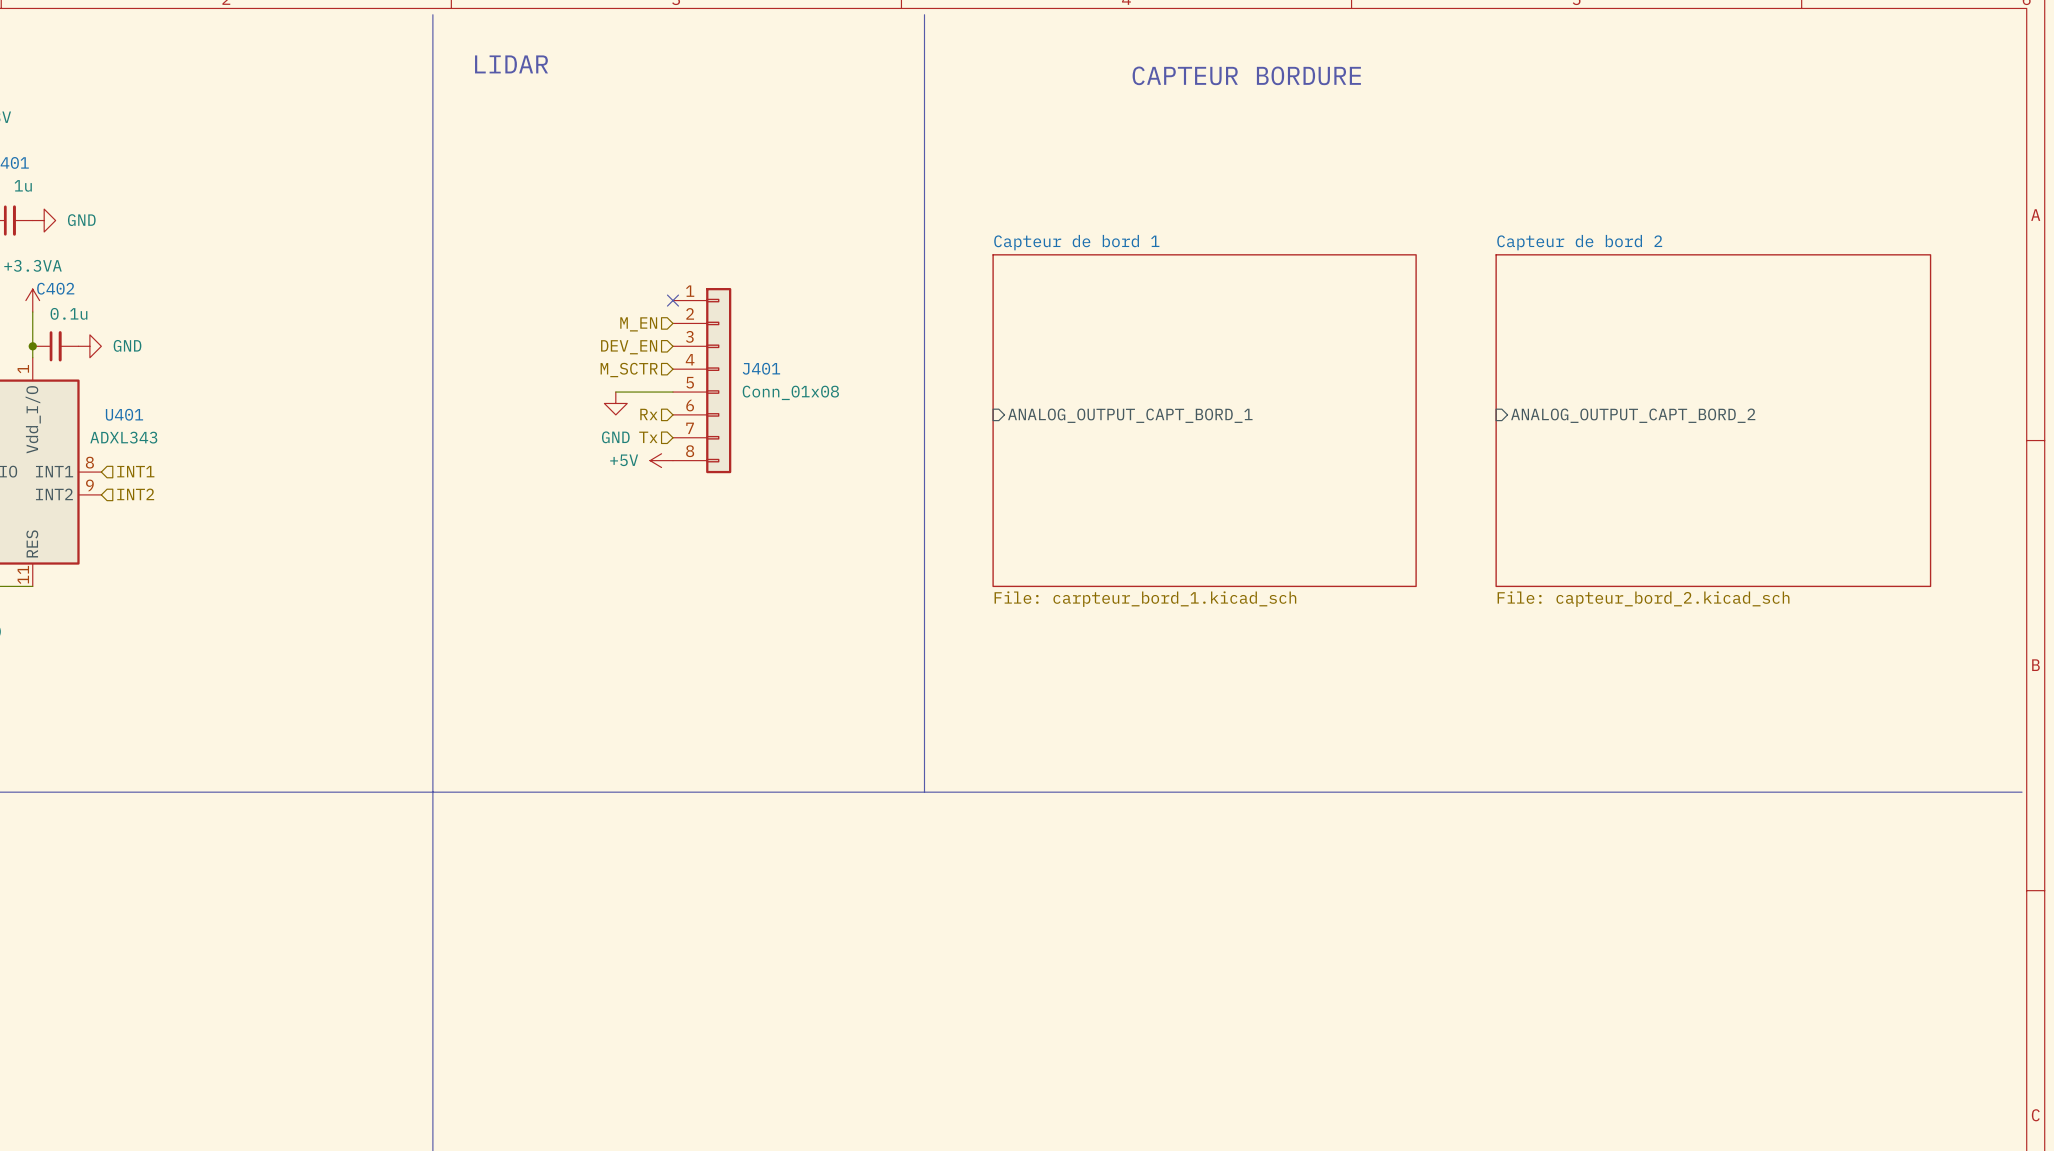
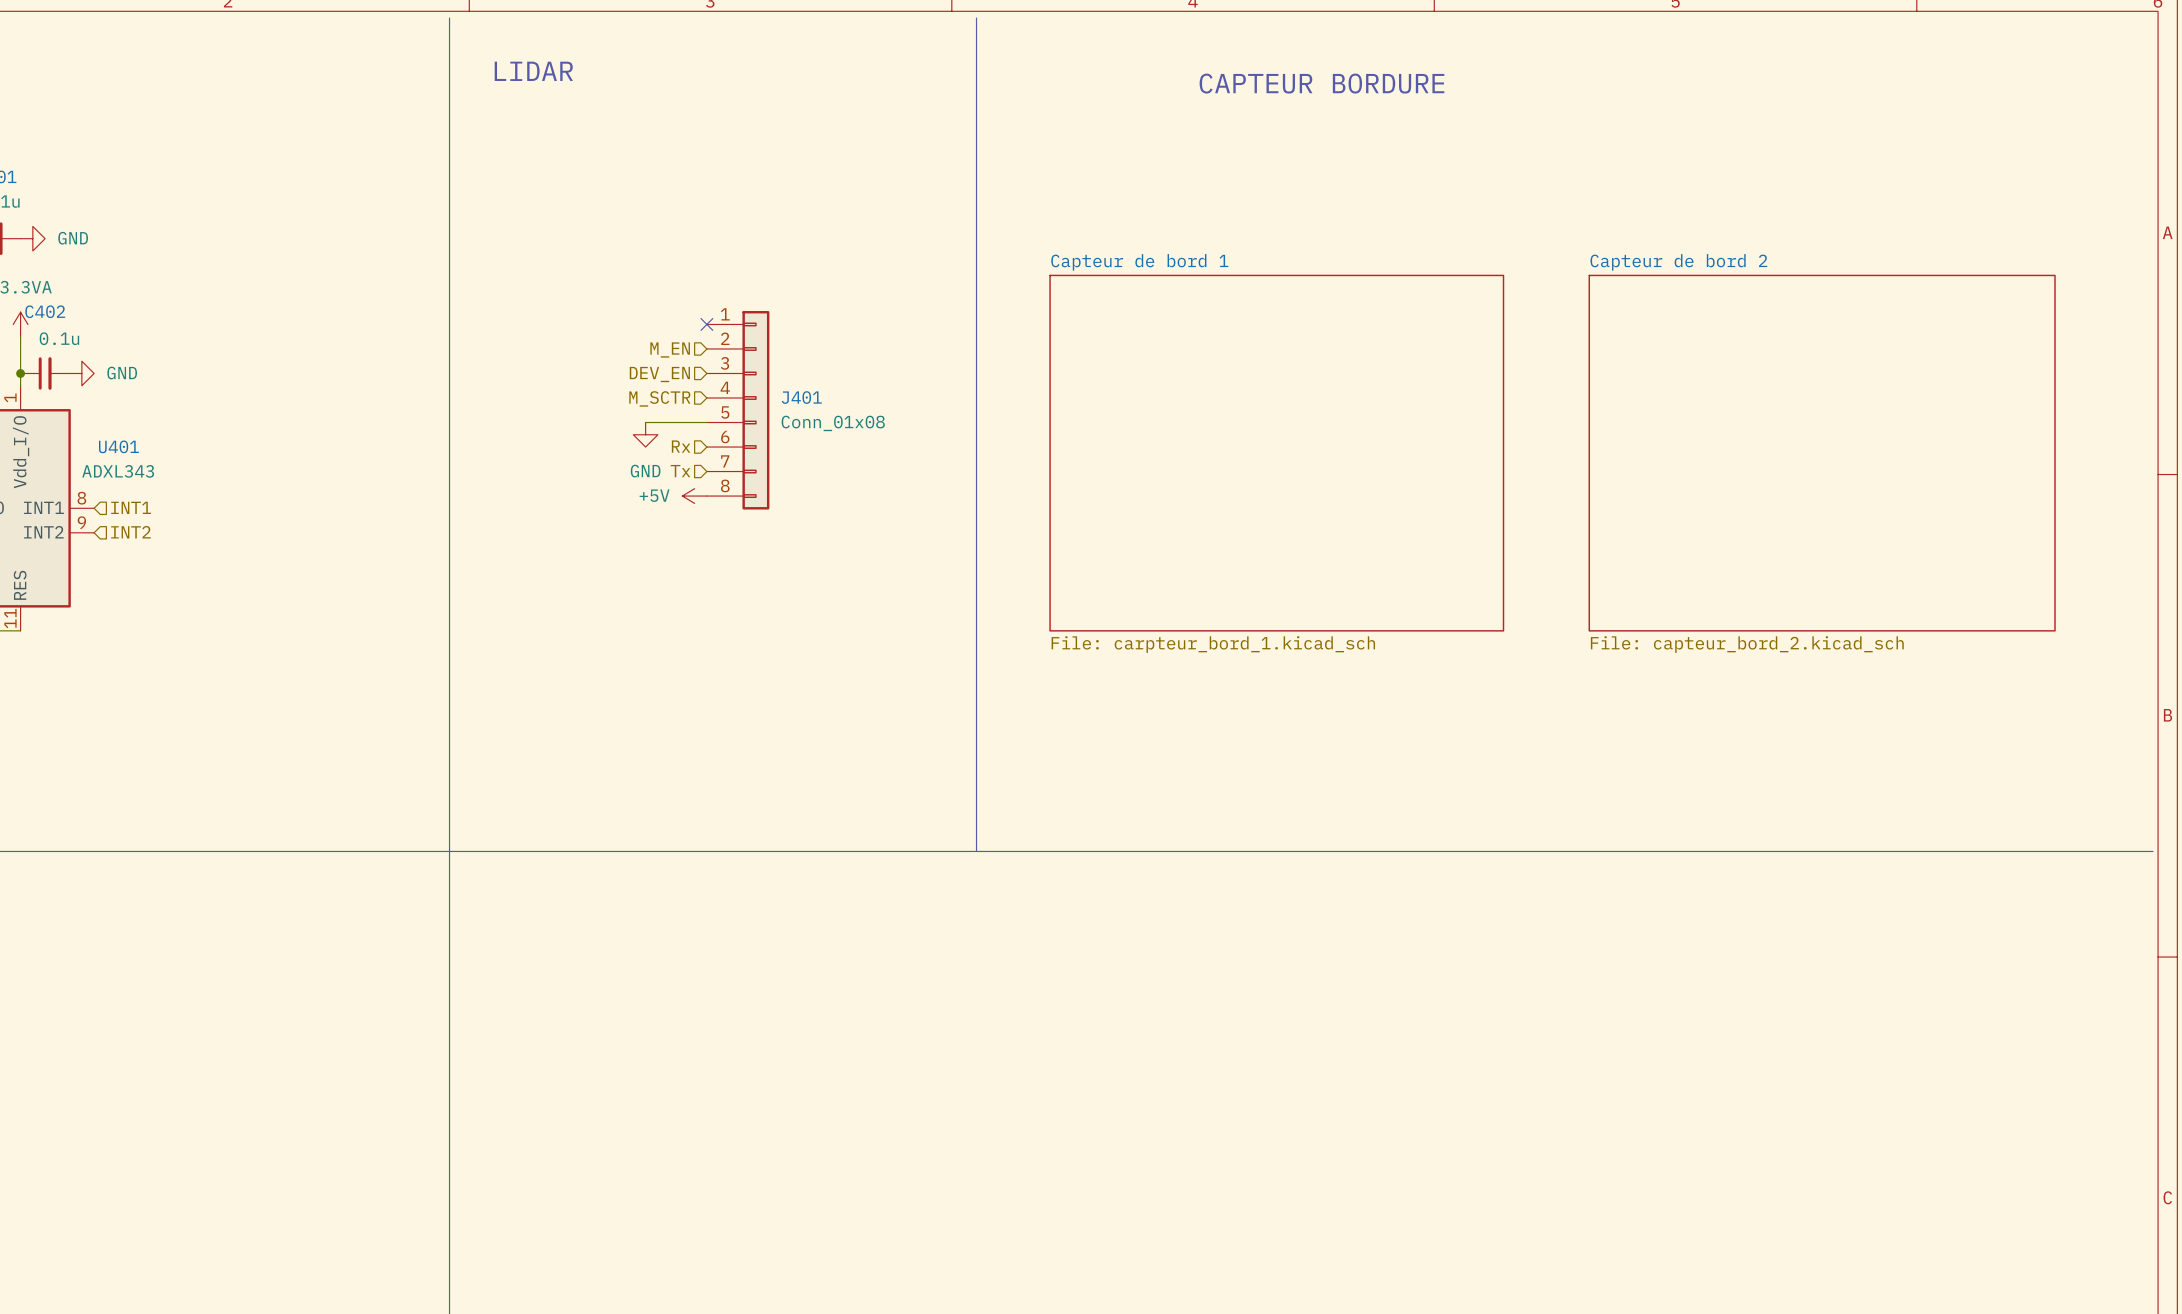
sheet pin: ANALOG_OUTPUT_CAPT_BORD_1 (1130, 415) -> none
sheet pin: ANALOG_OUTPUT_CAPT_BORD_2 (1633, 415) -> none

